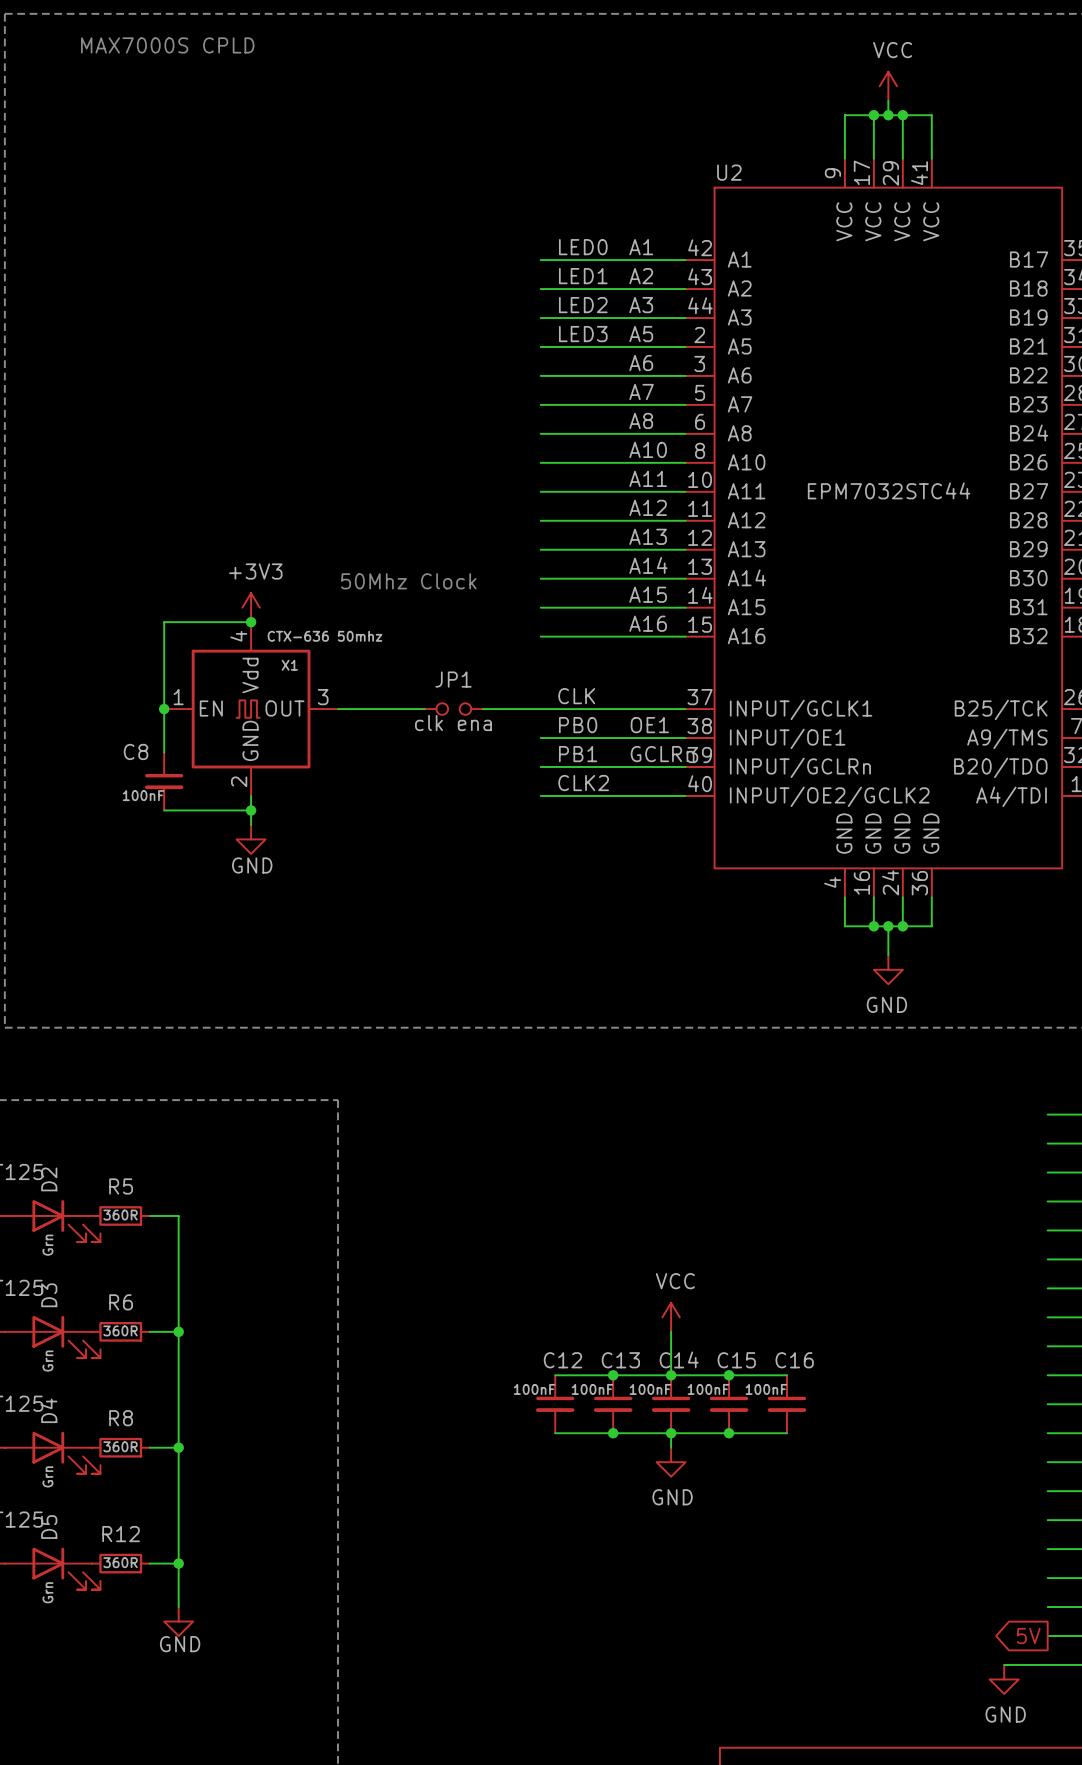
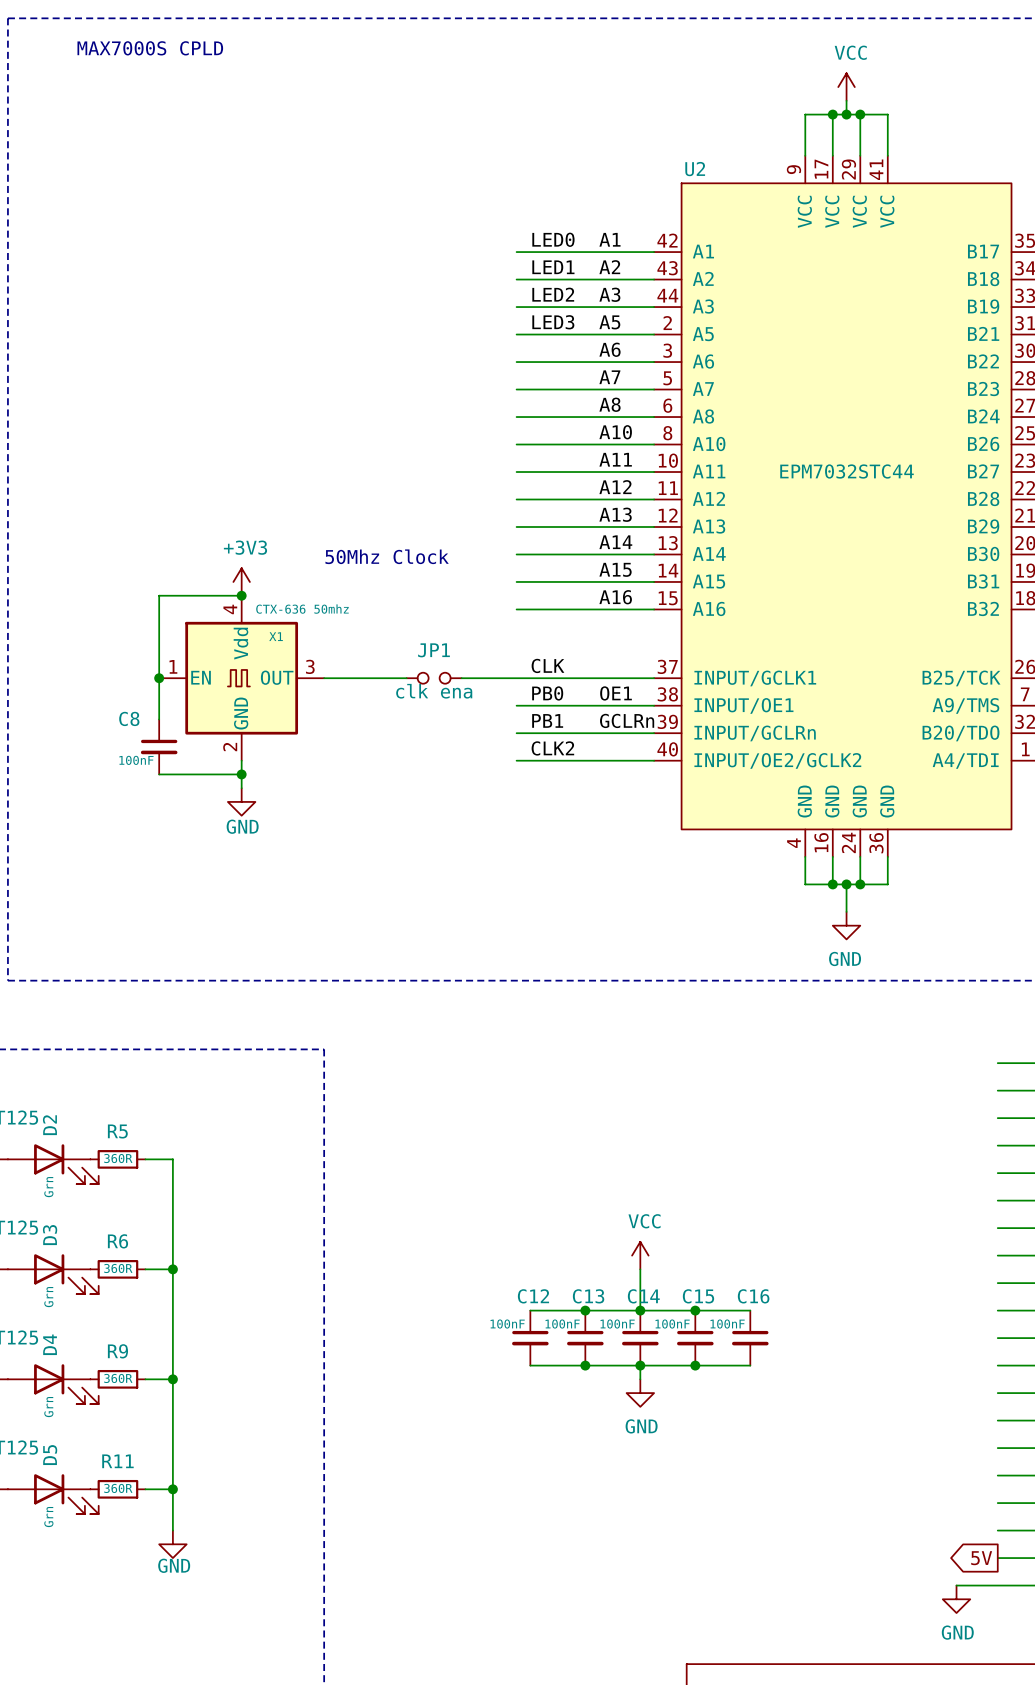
R8 name: R8 (121, 1418) -> R9 (117, 1351)
R12 name: R12 (121, 1534) -> R11 (117, 1461)

